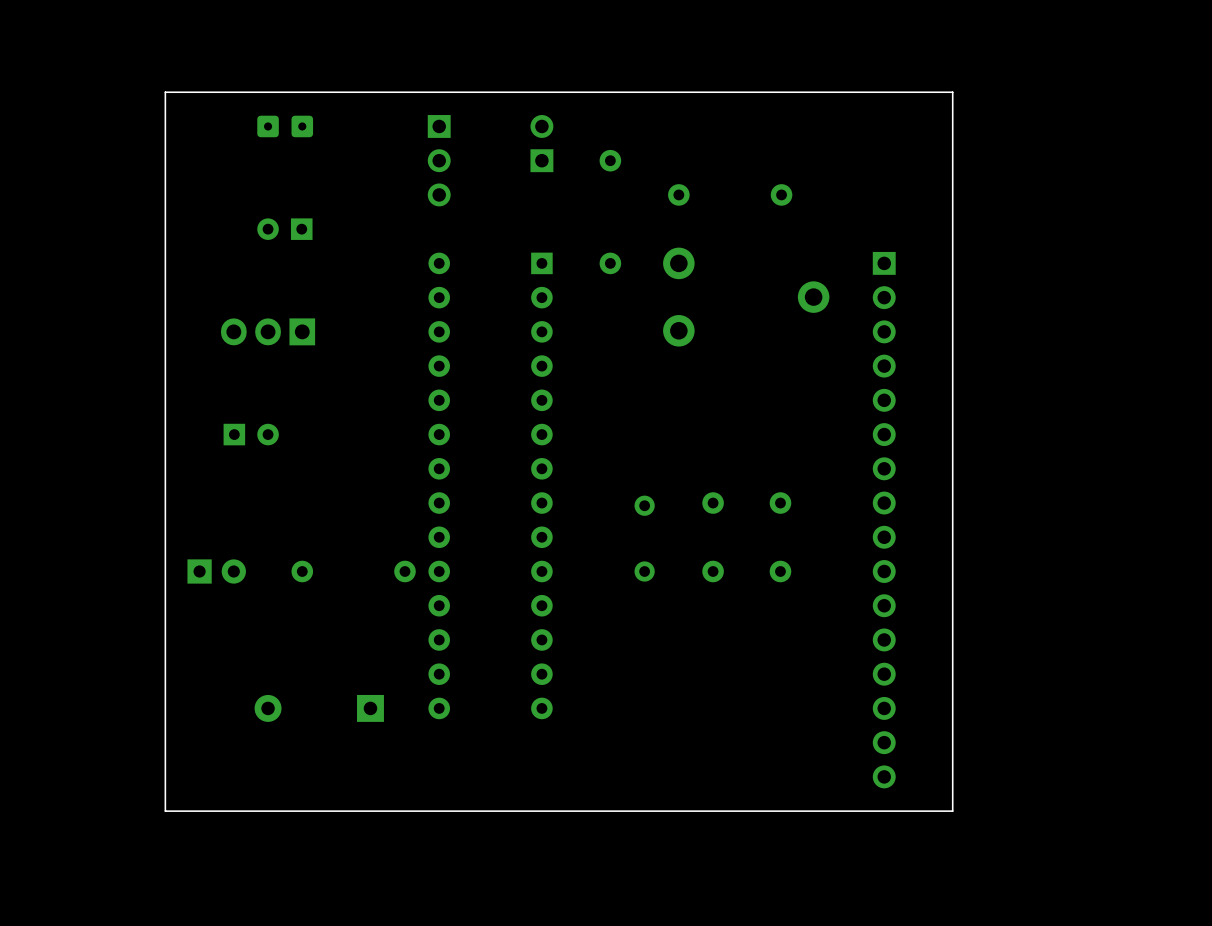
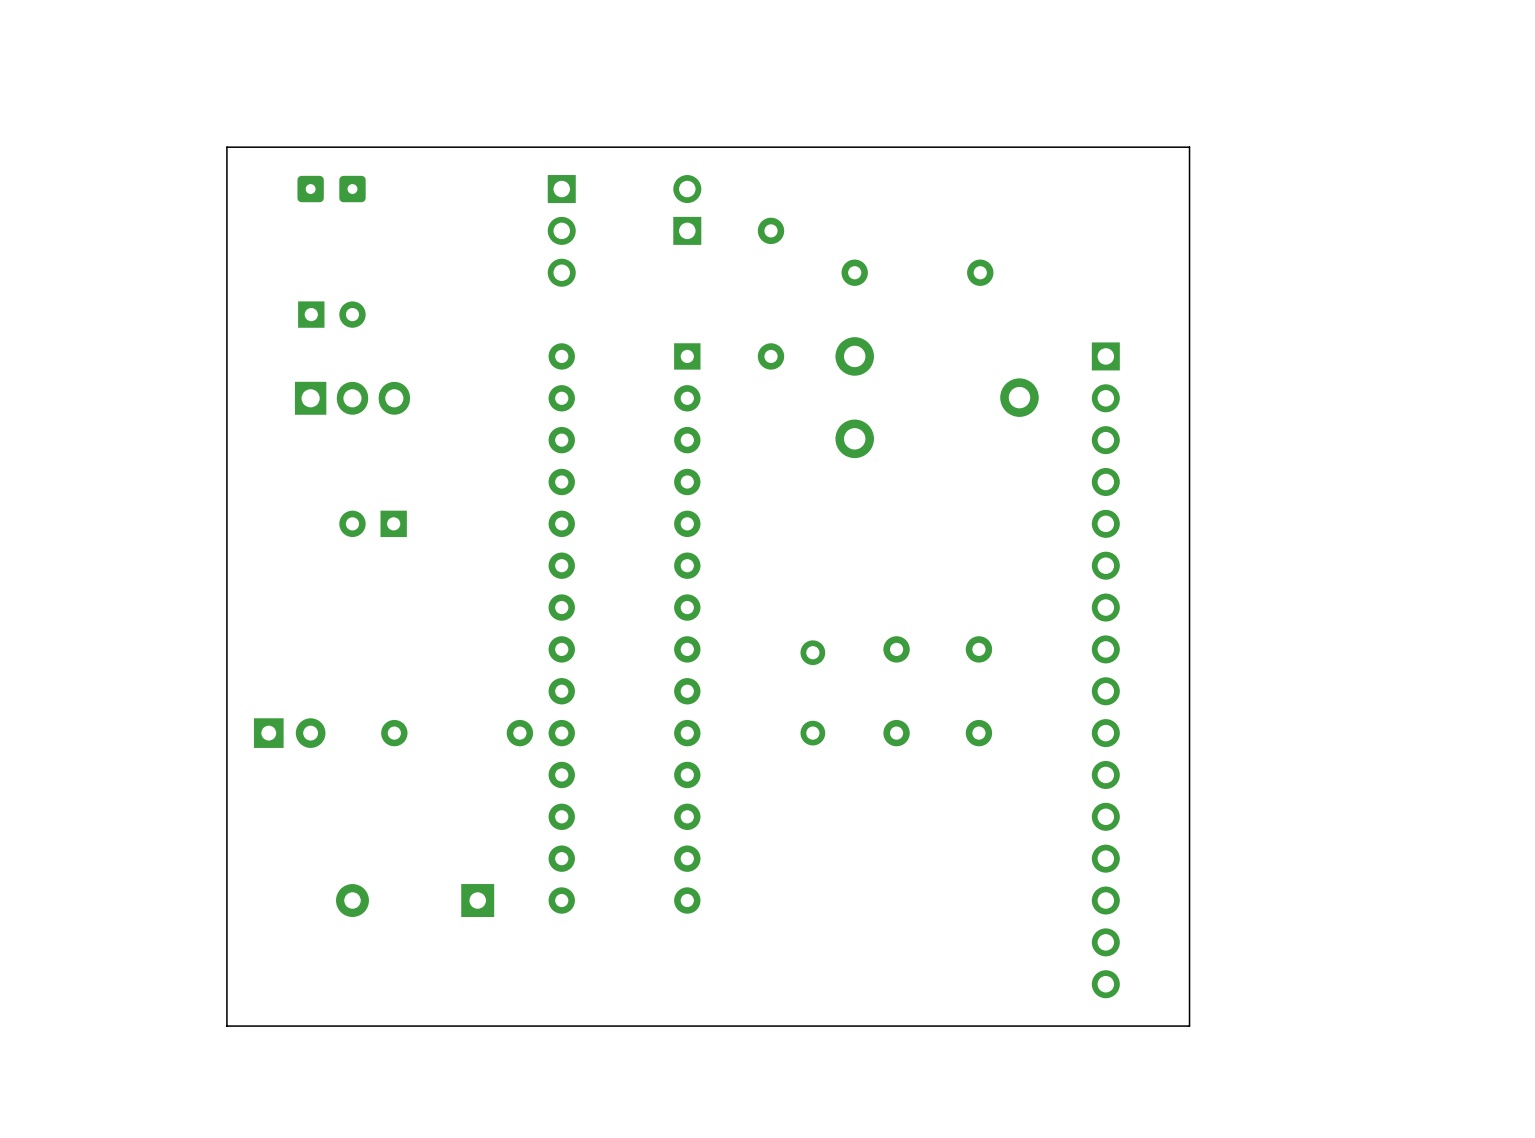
part position: (302, 126) -> (310, 189)
part rotation: 0° (284, 229) -> 180° (331, 314)
part position: (284, 229) -> (331, 314)
part rotation: 0° (268, 331) -> 180° (352, 398)
part rotation: 0° (251, 434) -> 180° (373, 523)
part position: (251, 434) -> (373, 523)

